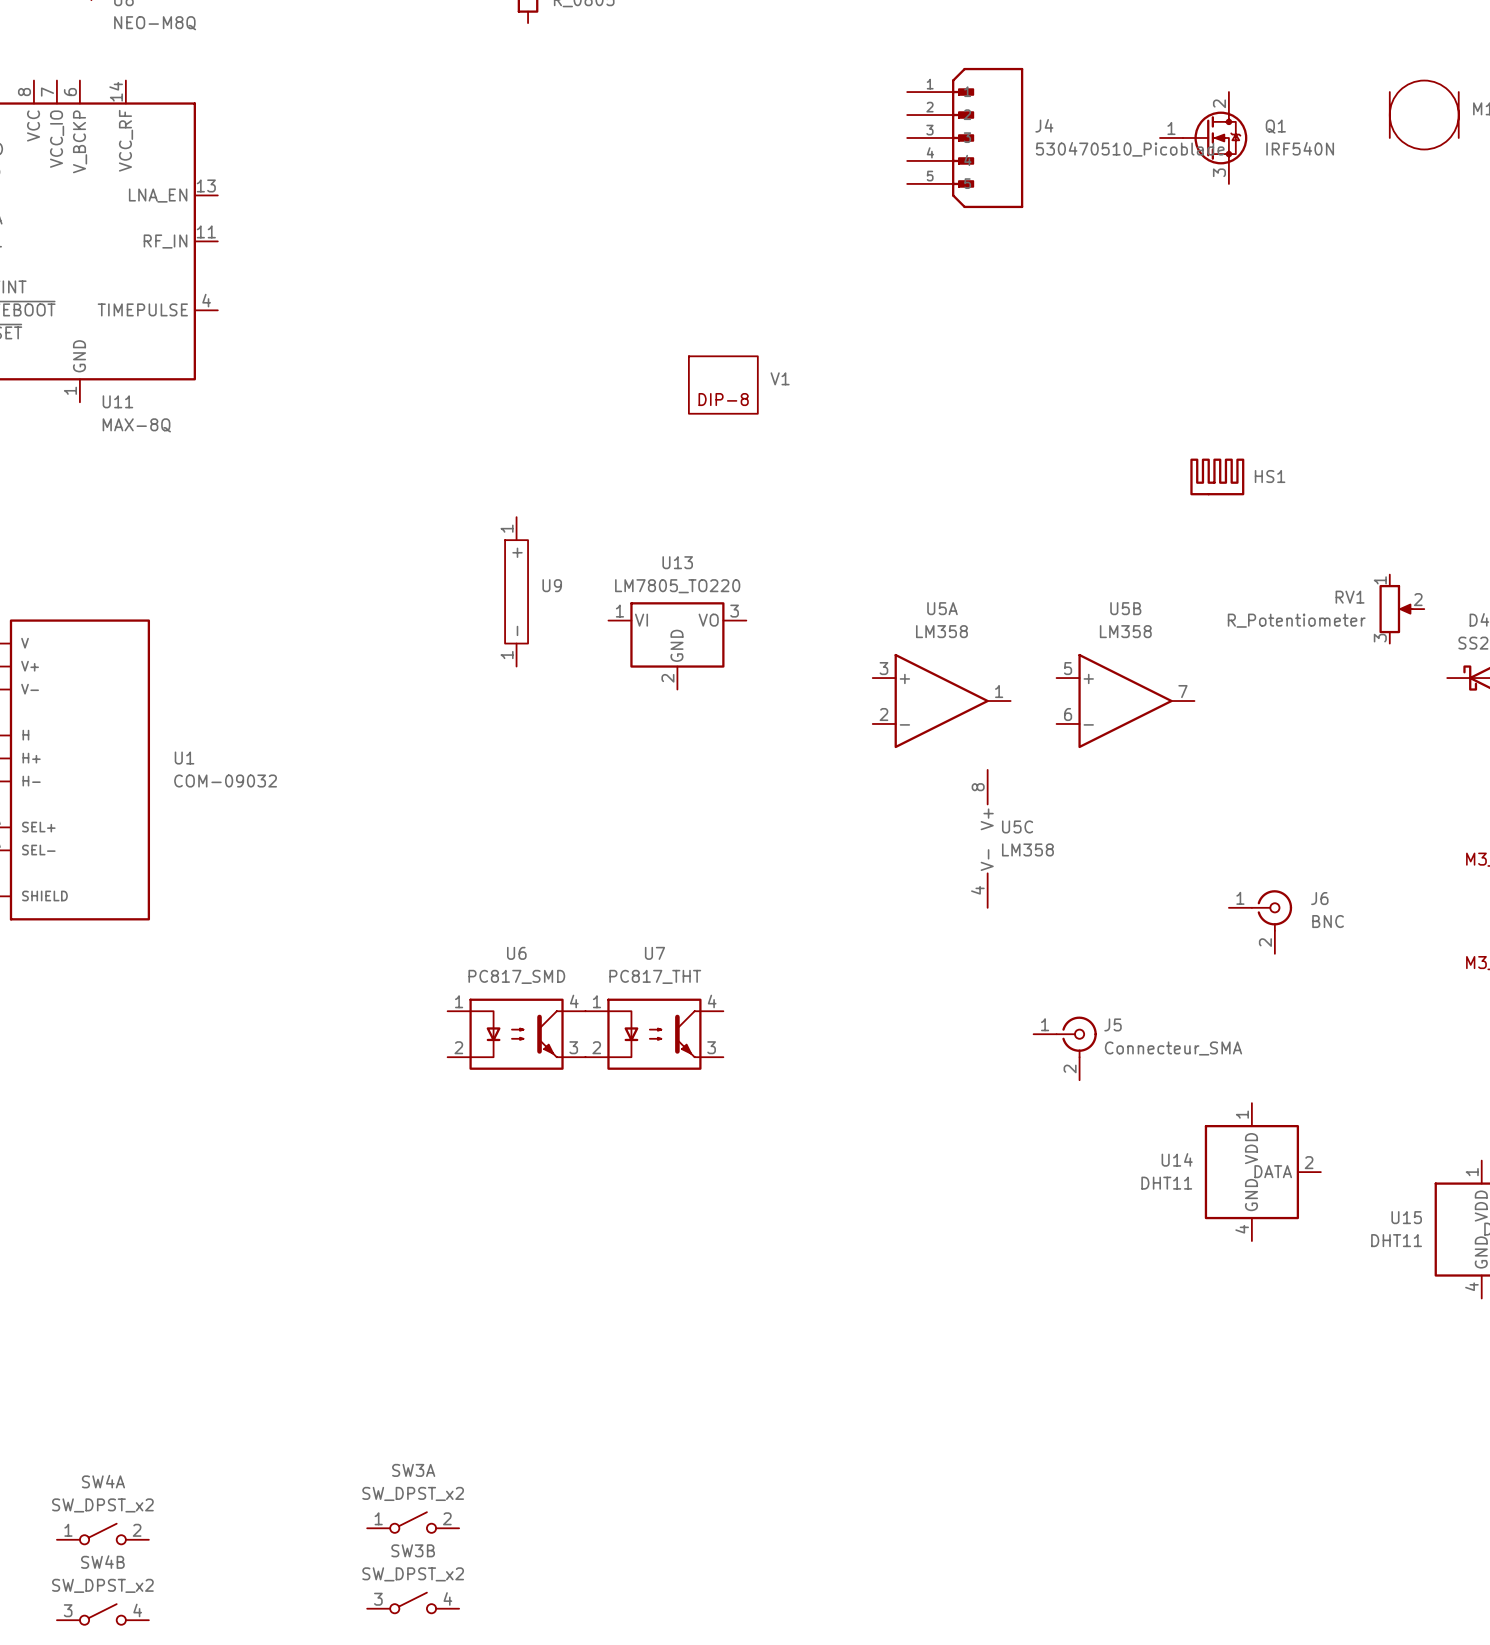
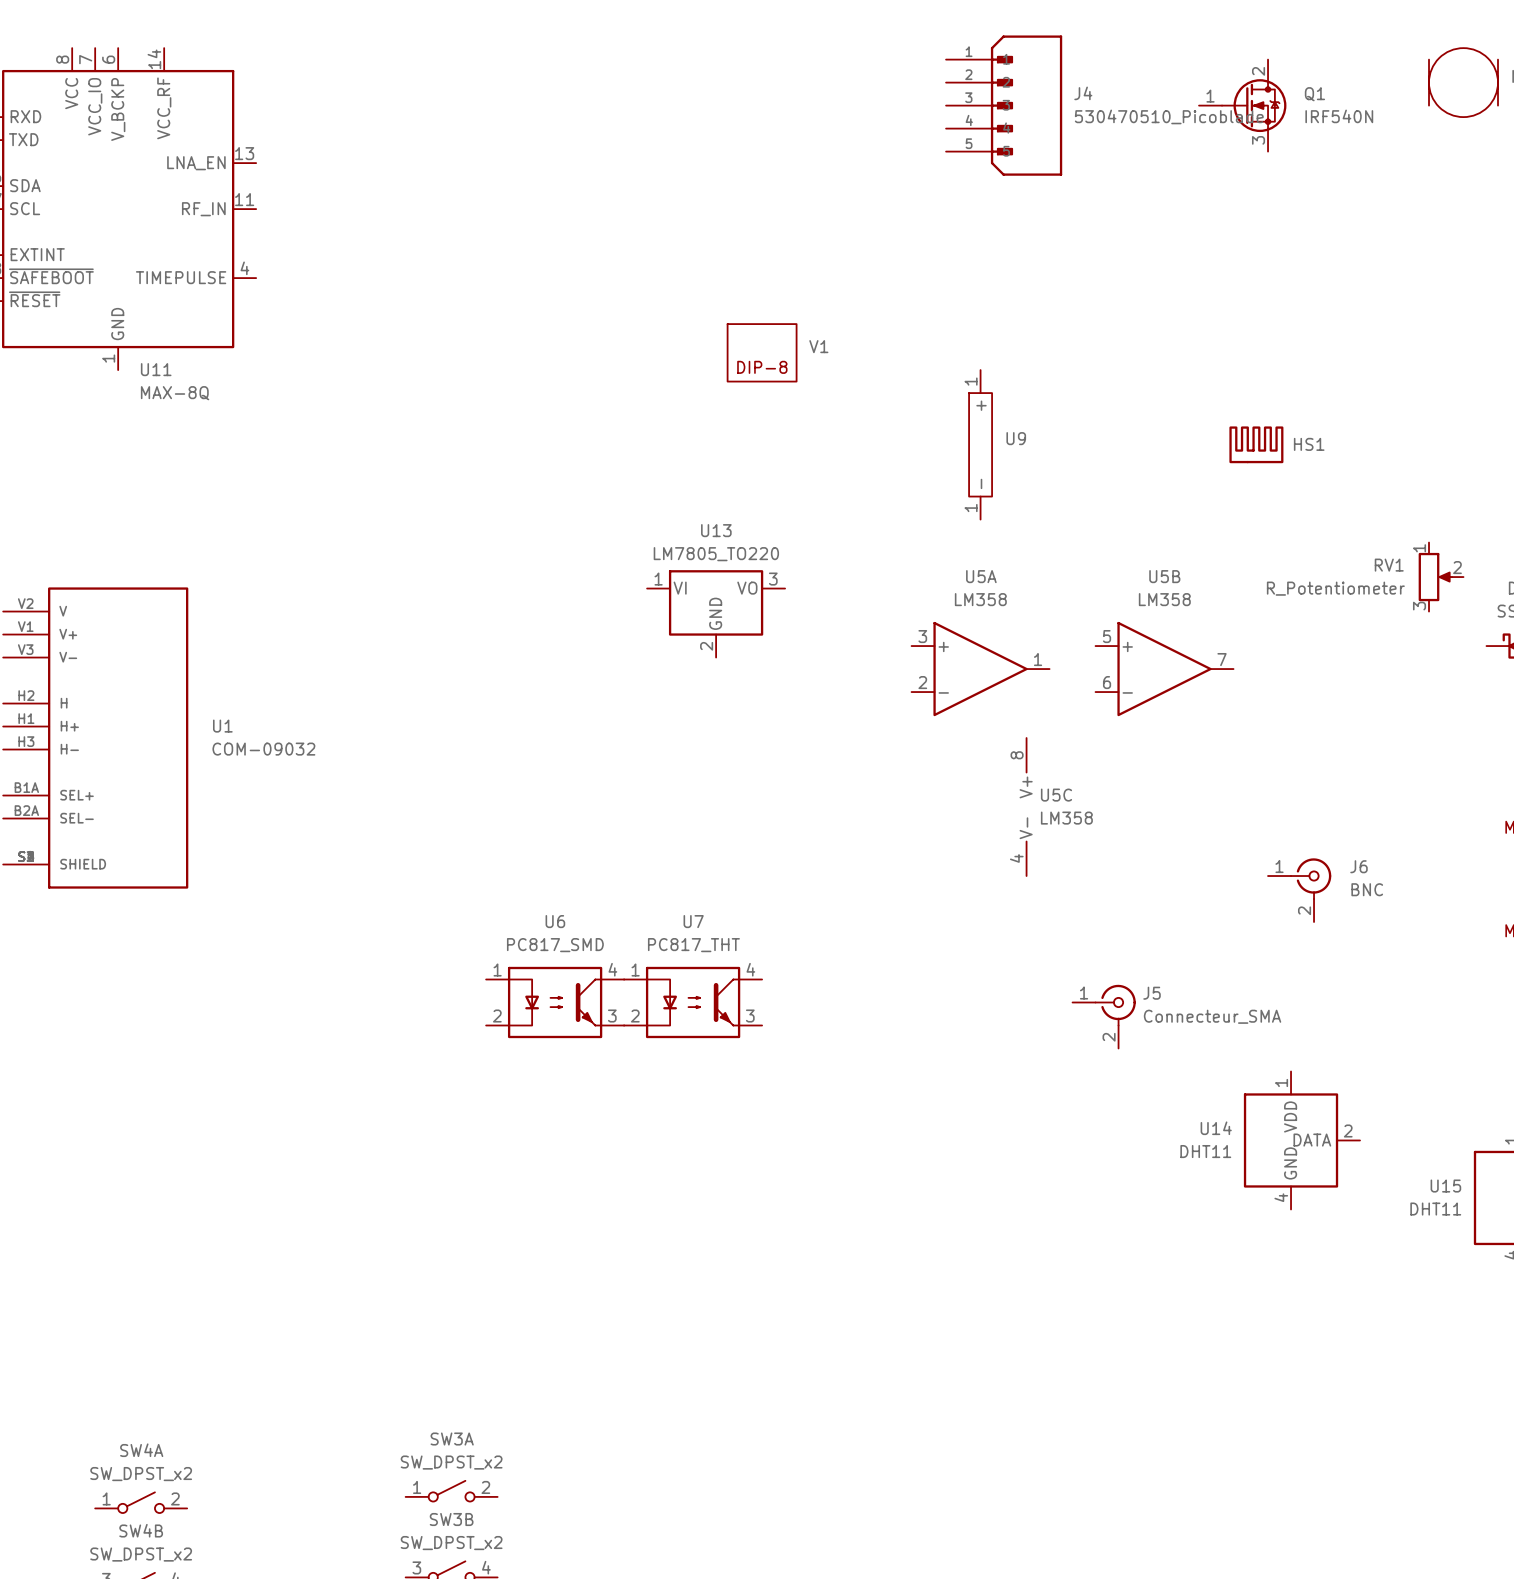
U9 position: (516, 591) -> (980, 444)

